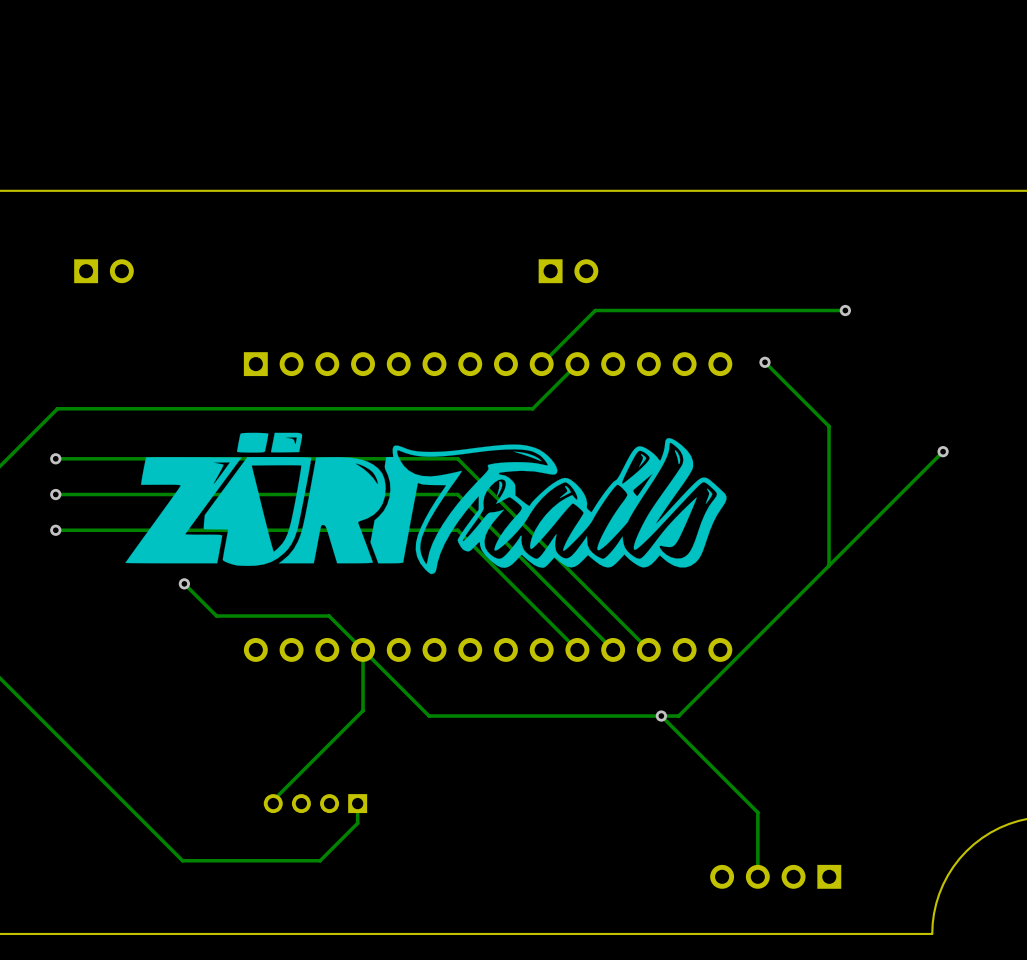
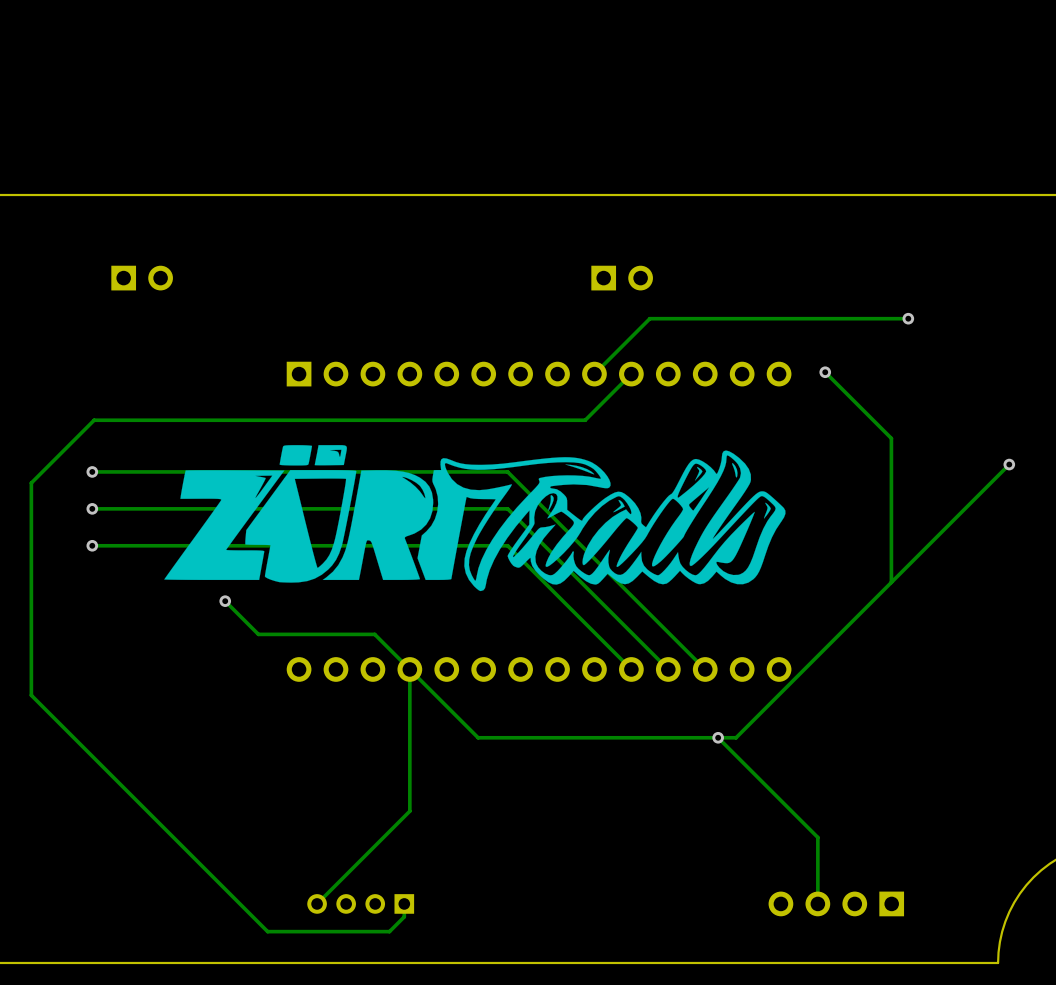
track: (363, 710) (273, 800) (273, 803) -> (409, 732) (409, 811) (317, 903)
part position: (315, 803) -> (360, 903)
track: (357, 803) (357, 823) (320, 860) (182, 860) -> (404, 903) (404, 916) (389, 931) (267, 931) (223, 887)

